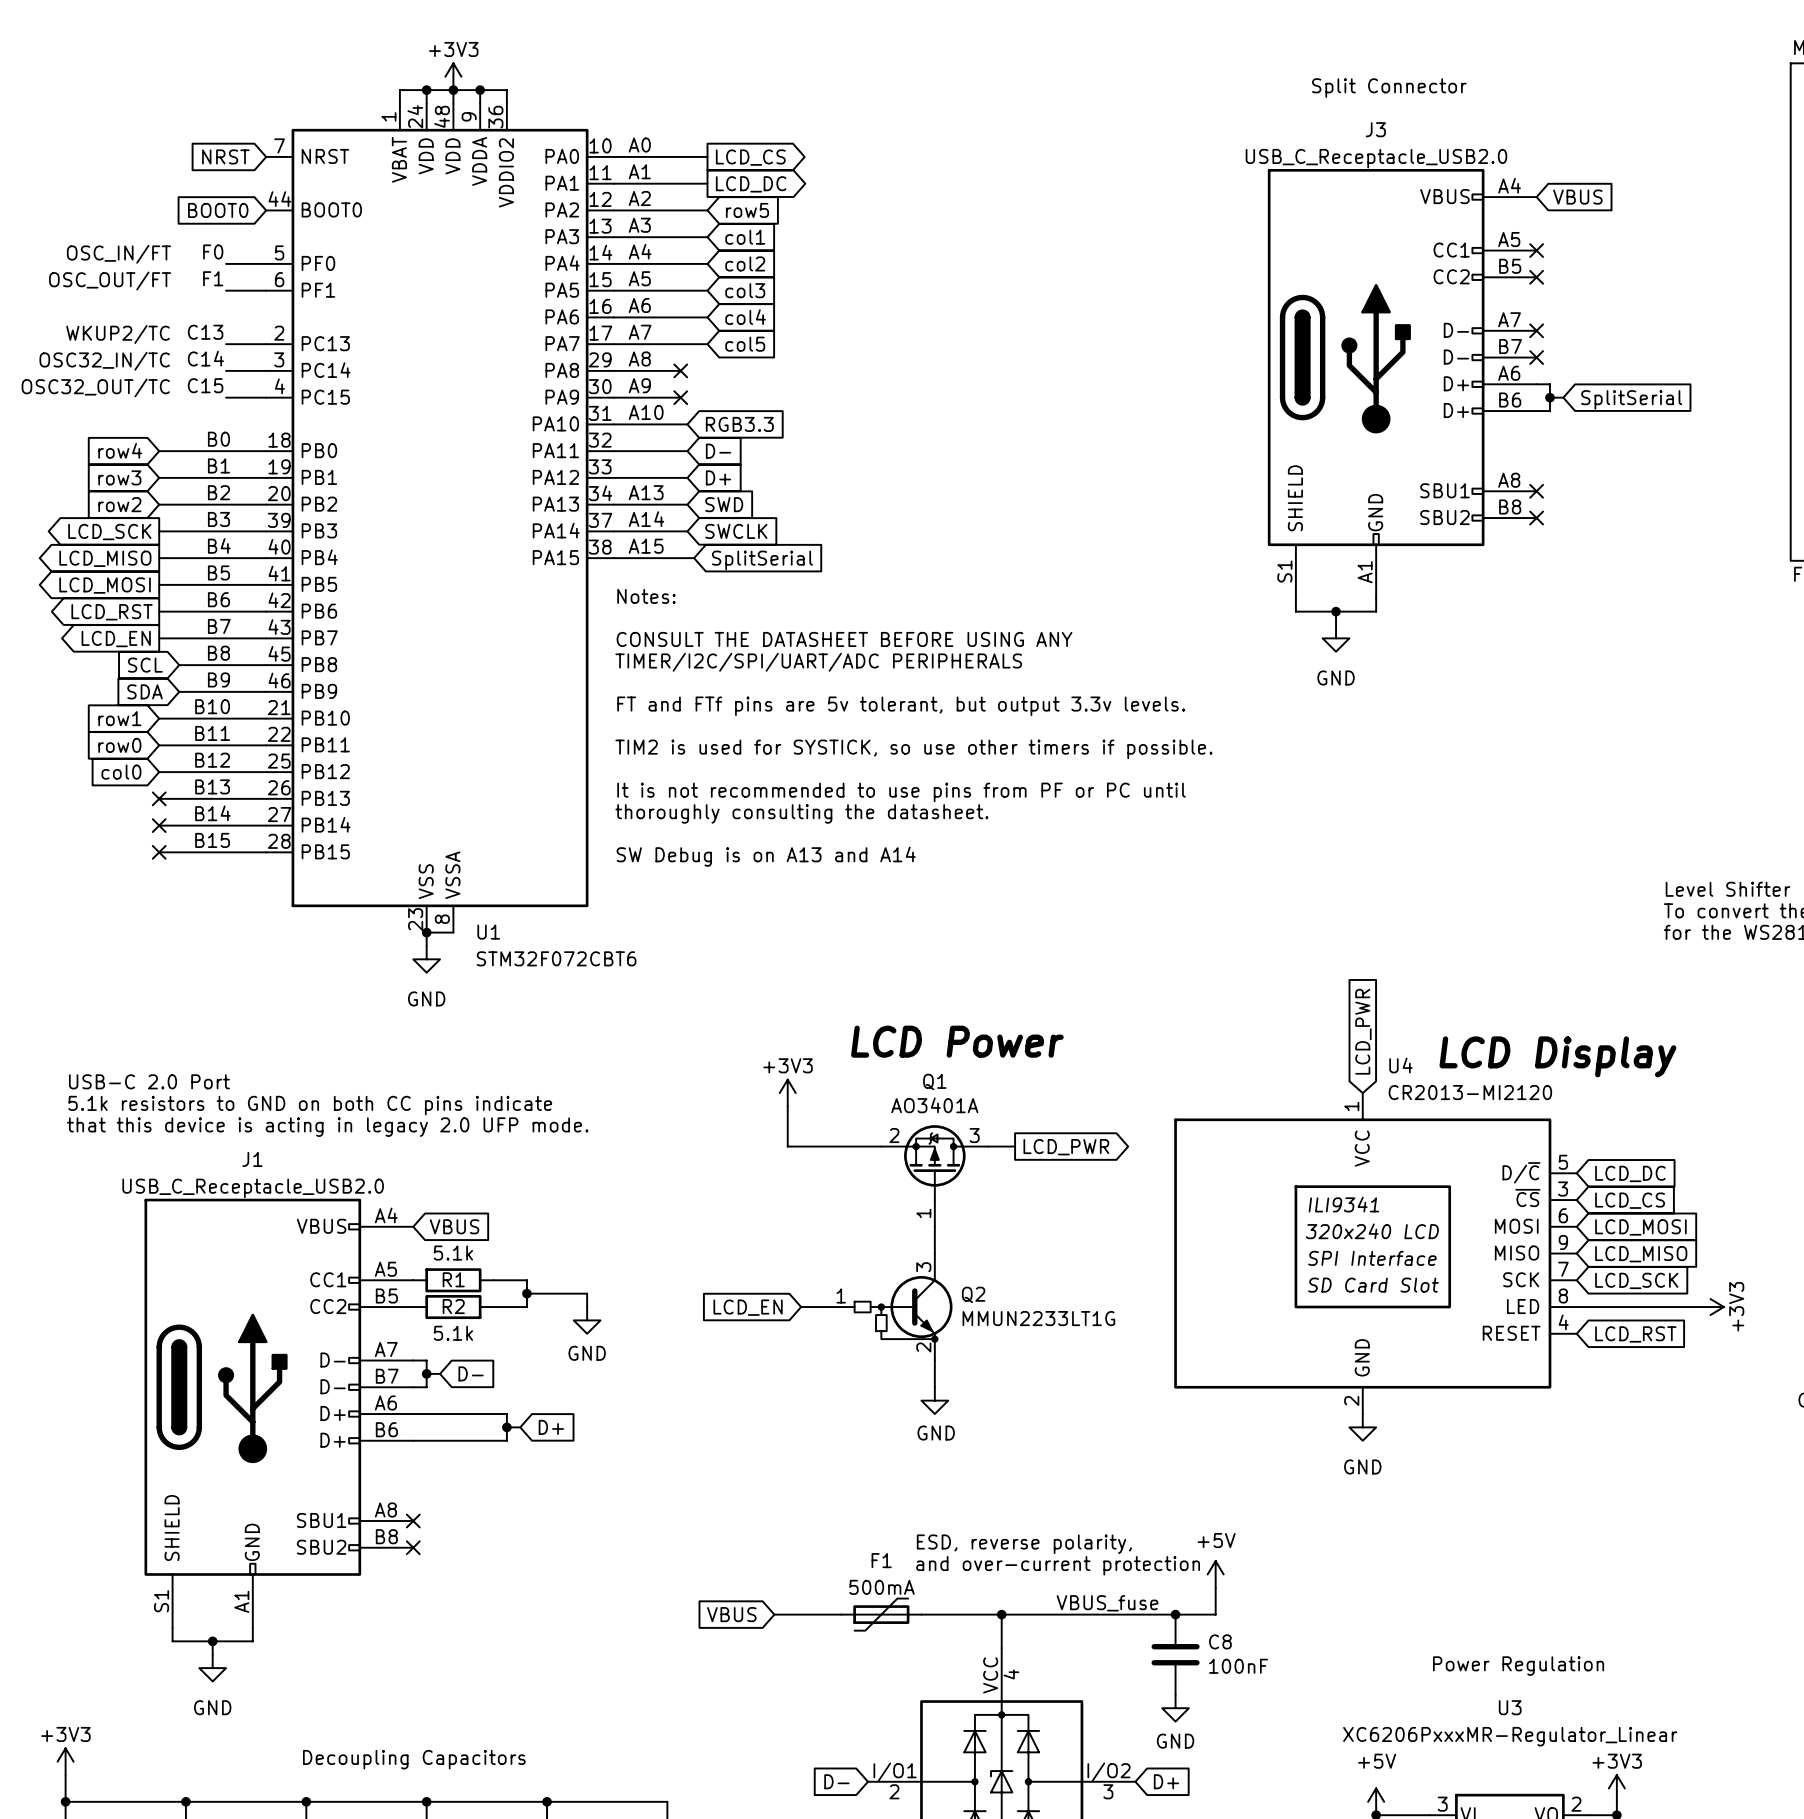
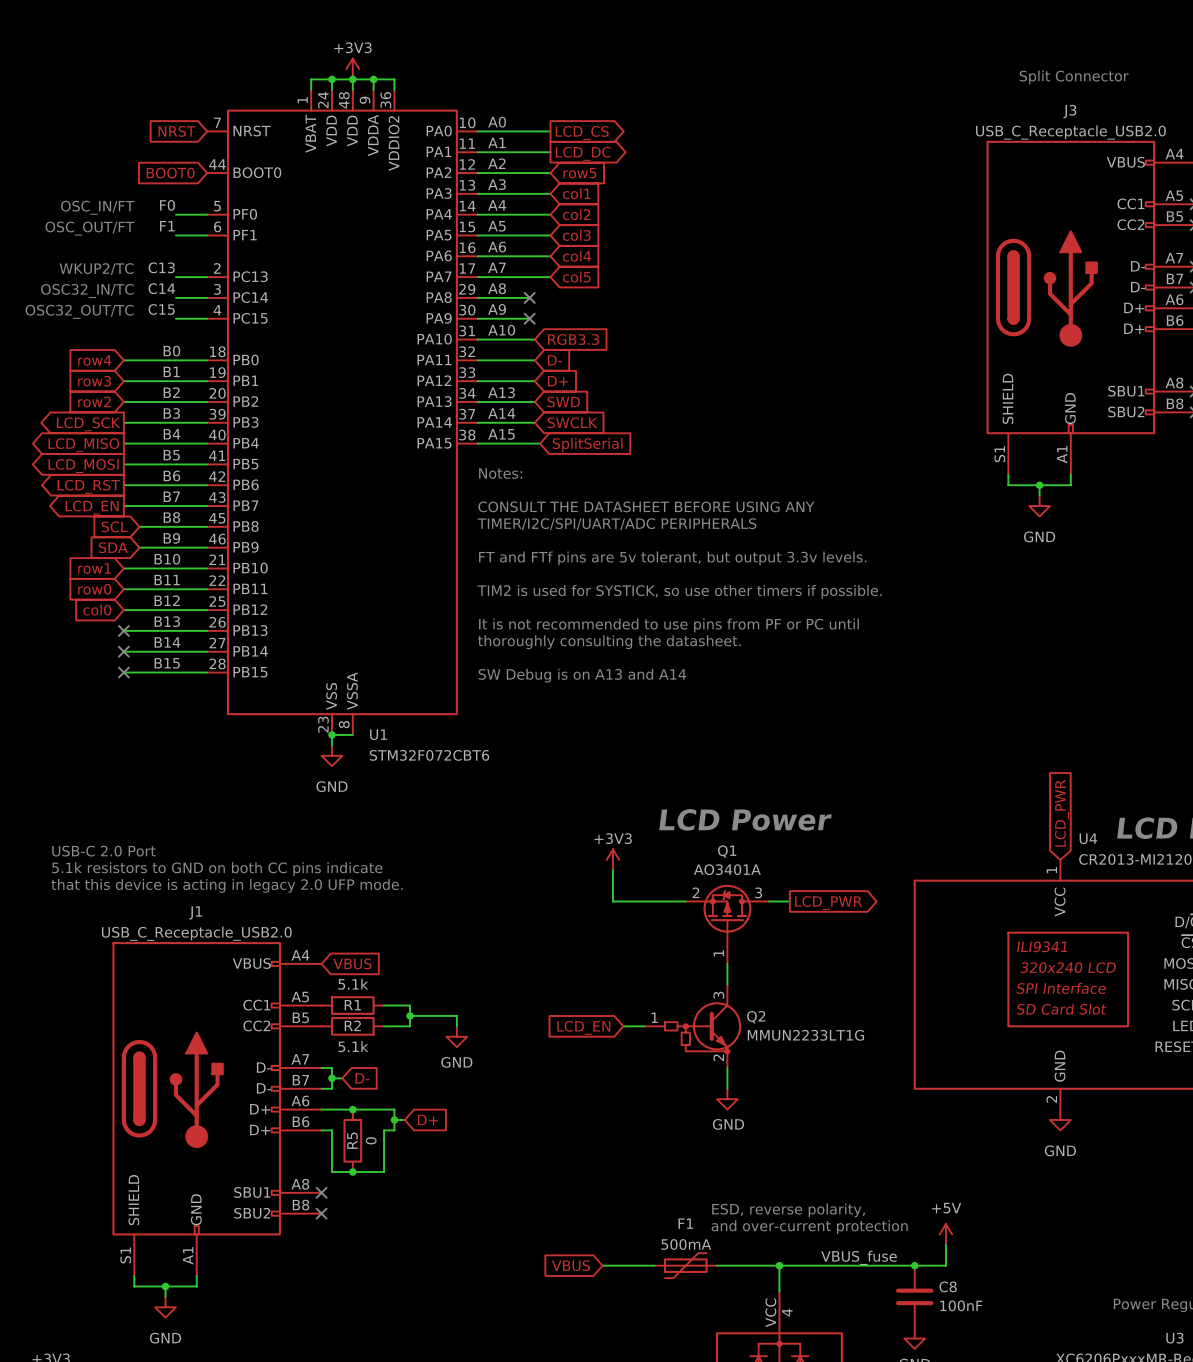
junction: none -> (352, 1109)
wire: (426, 1440) (493, 1440) -> (332, 1130) (332, 1172) (384, 1172) (384, 1130)
R5: none -> 0 (352, 1140)
junction: none -> (352, 1172)

